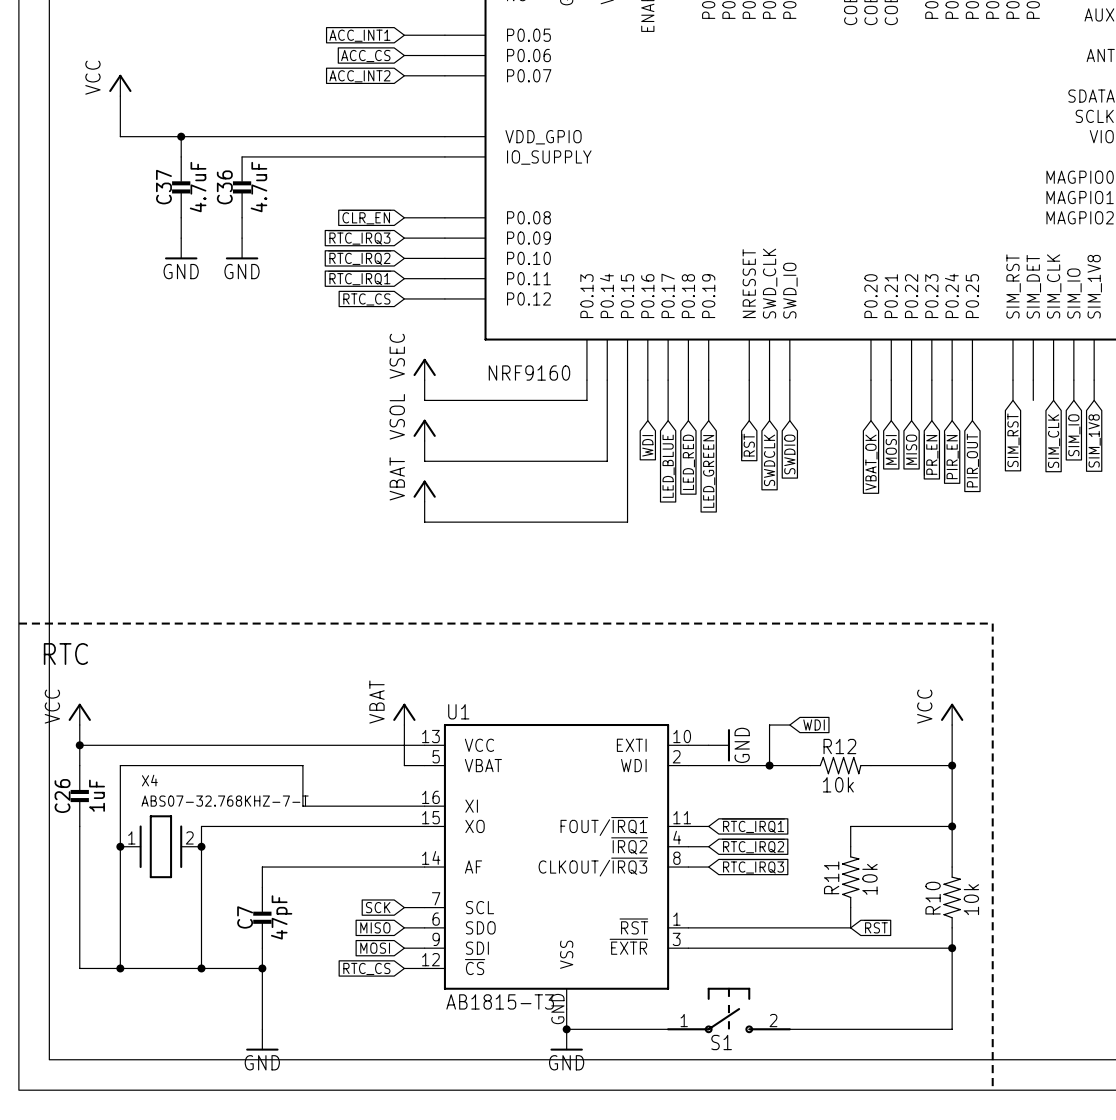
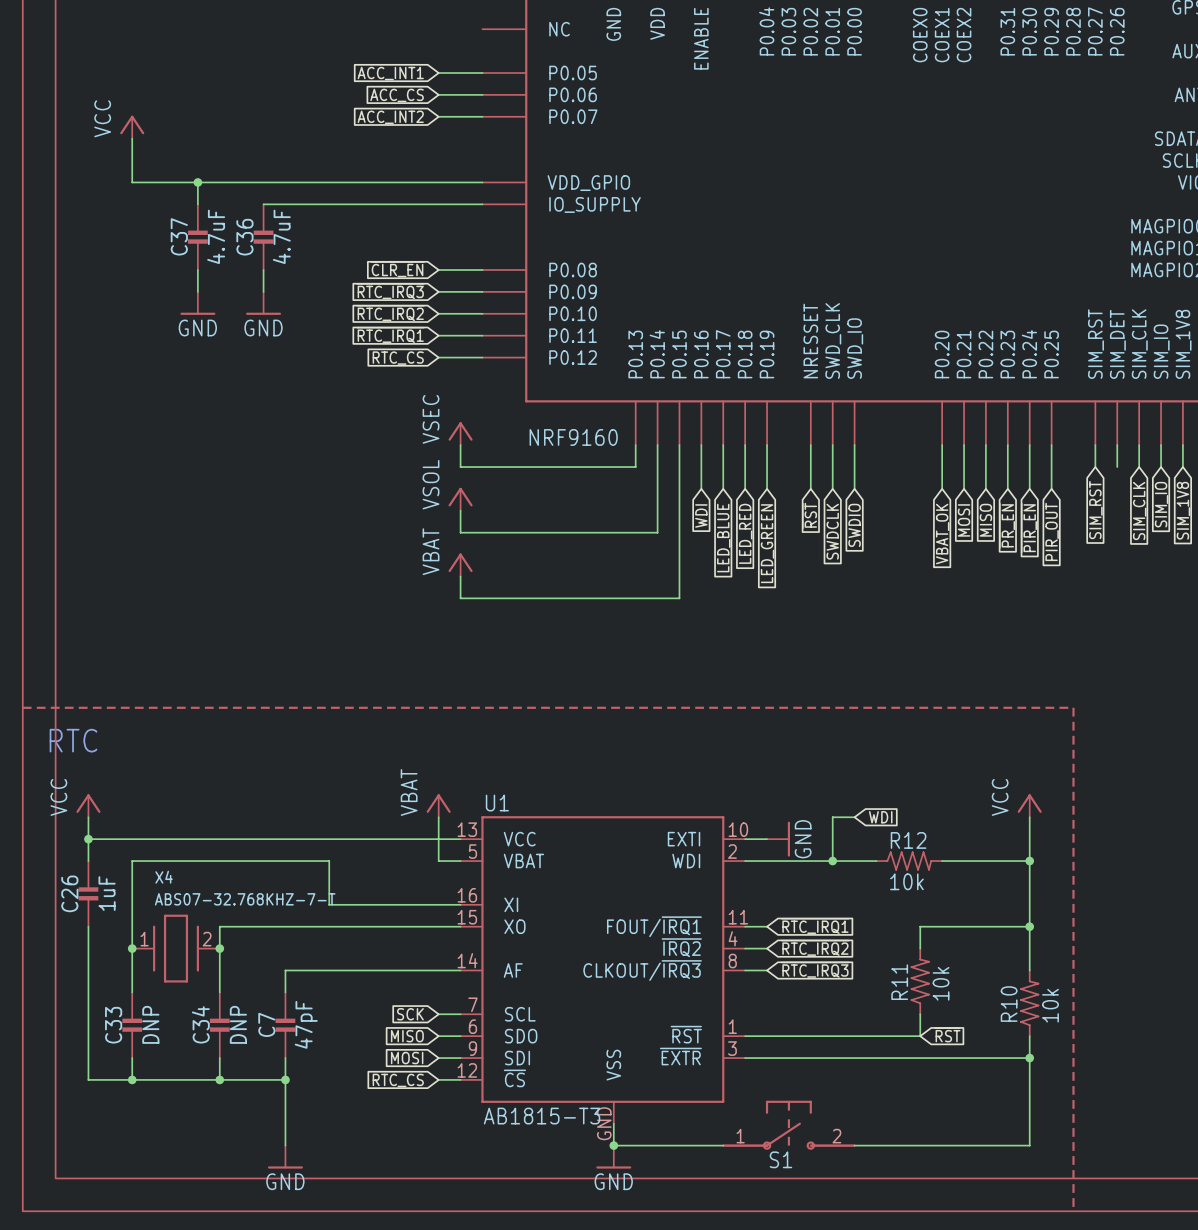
C33: none -> DNP (132, 1025)
C34: none -> DNP (219, 1025)

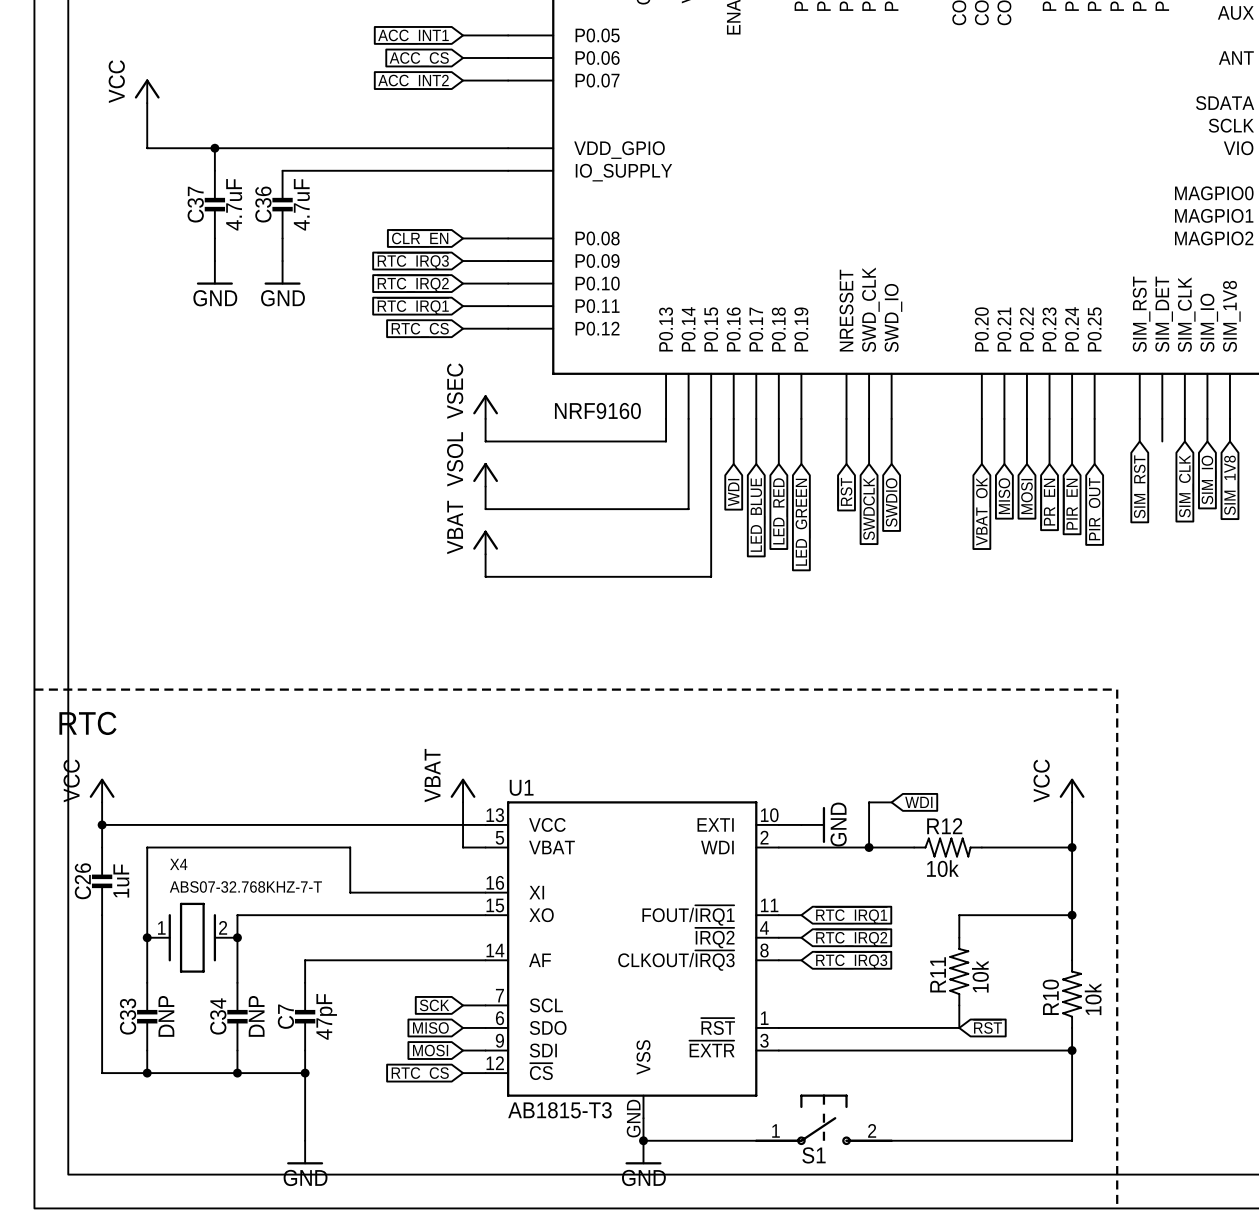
global label: MOSI (964, 520) -> MISO (1004, 496)
global label: MISO (985, 520) -> MOSI (1026, 496)

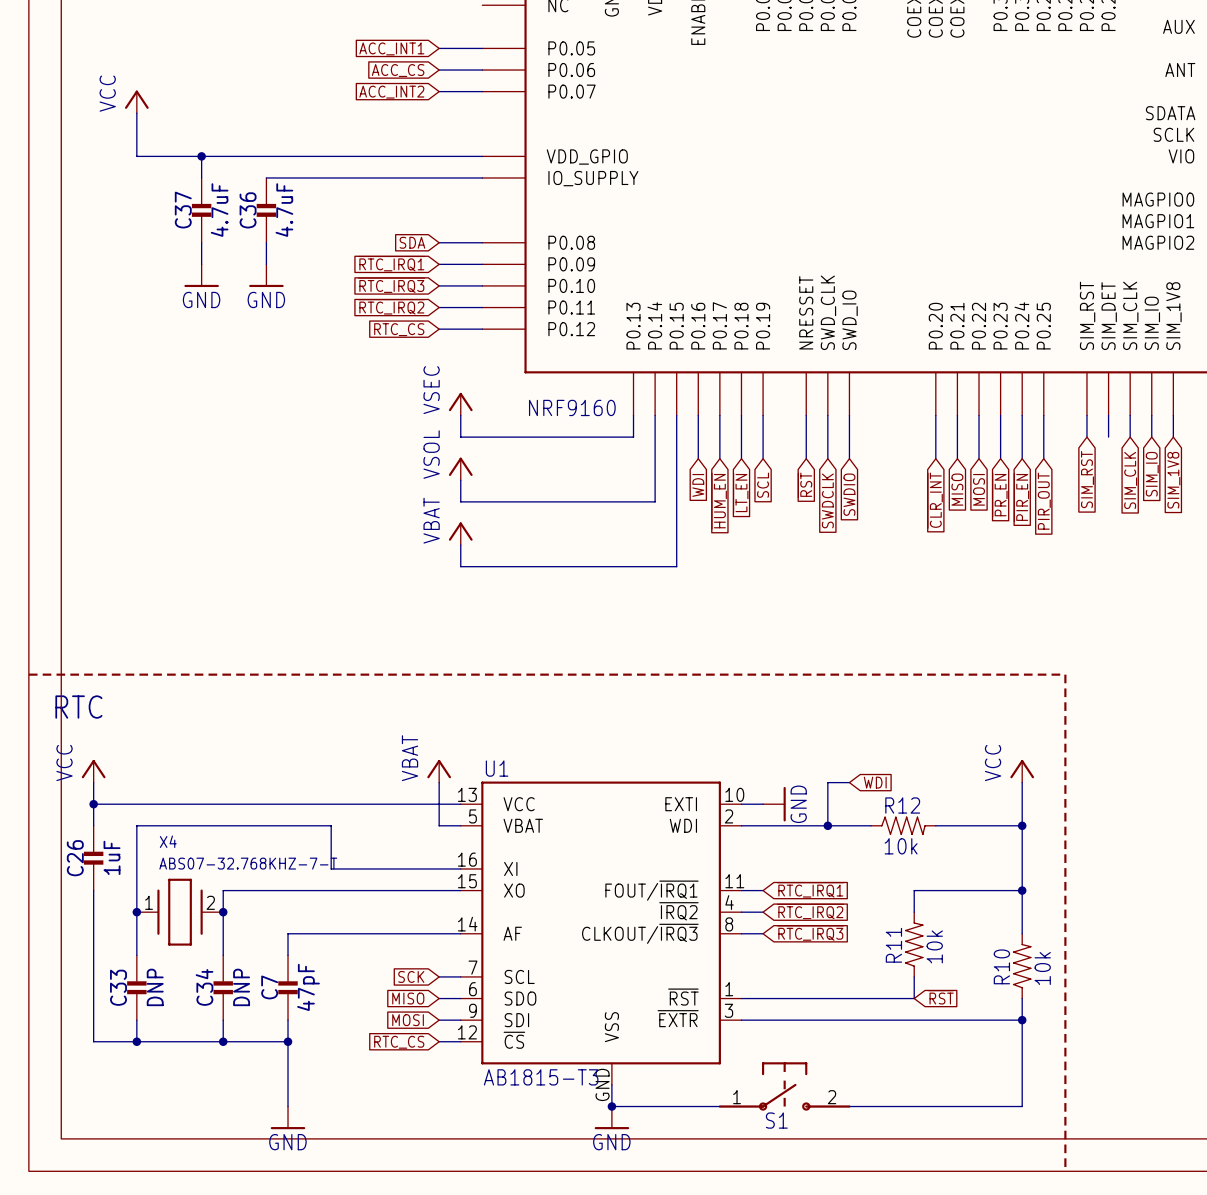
global label: ~{CLR_EN} (420, 238) -> SDA (412, 242)
global label: ~{RTC_IRQ3} (413, 261) -> ~{RTC_IRQ1} (391, 263)
global label: ~{RTC_IRQ2} (413, 283) -> ~{RTC_IRQ3} (391, 285)
global label: ~{RTC_IRQ1} (413, 306) -> ~{RTC_IRQ2} (391, 306)
global label: LED_RED (780, 511) -> ~{LT_EN} (740, 493)
global label: VBAT_OK (983, 511) -> ~{CLR_INT} (935, 500)
global label: LED_BLUE (757, 515) -> ~{HUM_EN} (719, 501)
global label: LED_GREEN (802, 522) -> SCL (763, 485)

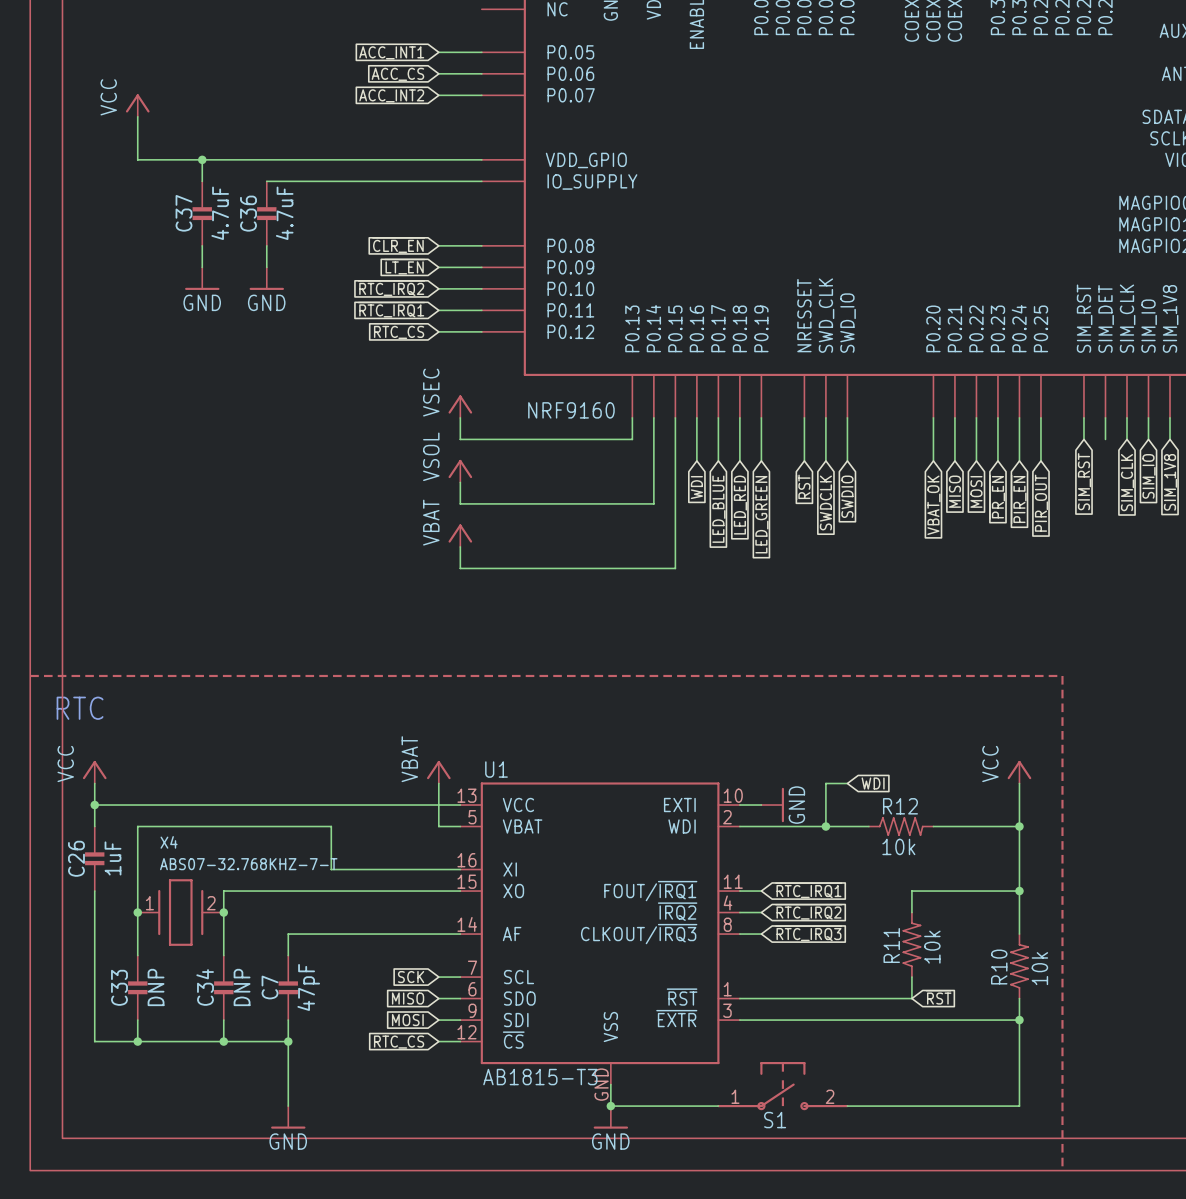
global label: SDA (412, 242) -> ~{CLR_EN} (398, 245)
global label: ~{RTC_IRQ1} (391, 263) -> ~{LT_EN} (404, 266)
global label: ~{RTC_IRQ3} (391, 285) -> ~{RTC_IRQ2} (391, 288)
global label: ~{RTC_IRQ2} (391, 306) -> ~{RTC_IRQ1} (391, 309)
global label: SCL (763, 485) -> LED_GREEN (761, 514)
global label: ~{LT_EN} (740, 493) -> LED_RED (740, 505)
global label: ~{CLR_INT} (935, 500) -> VBAT_OK (933, 505)
global label: ~{HUM_EN} (719, 501) -> LED_BLUE (718, 509)

